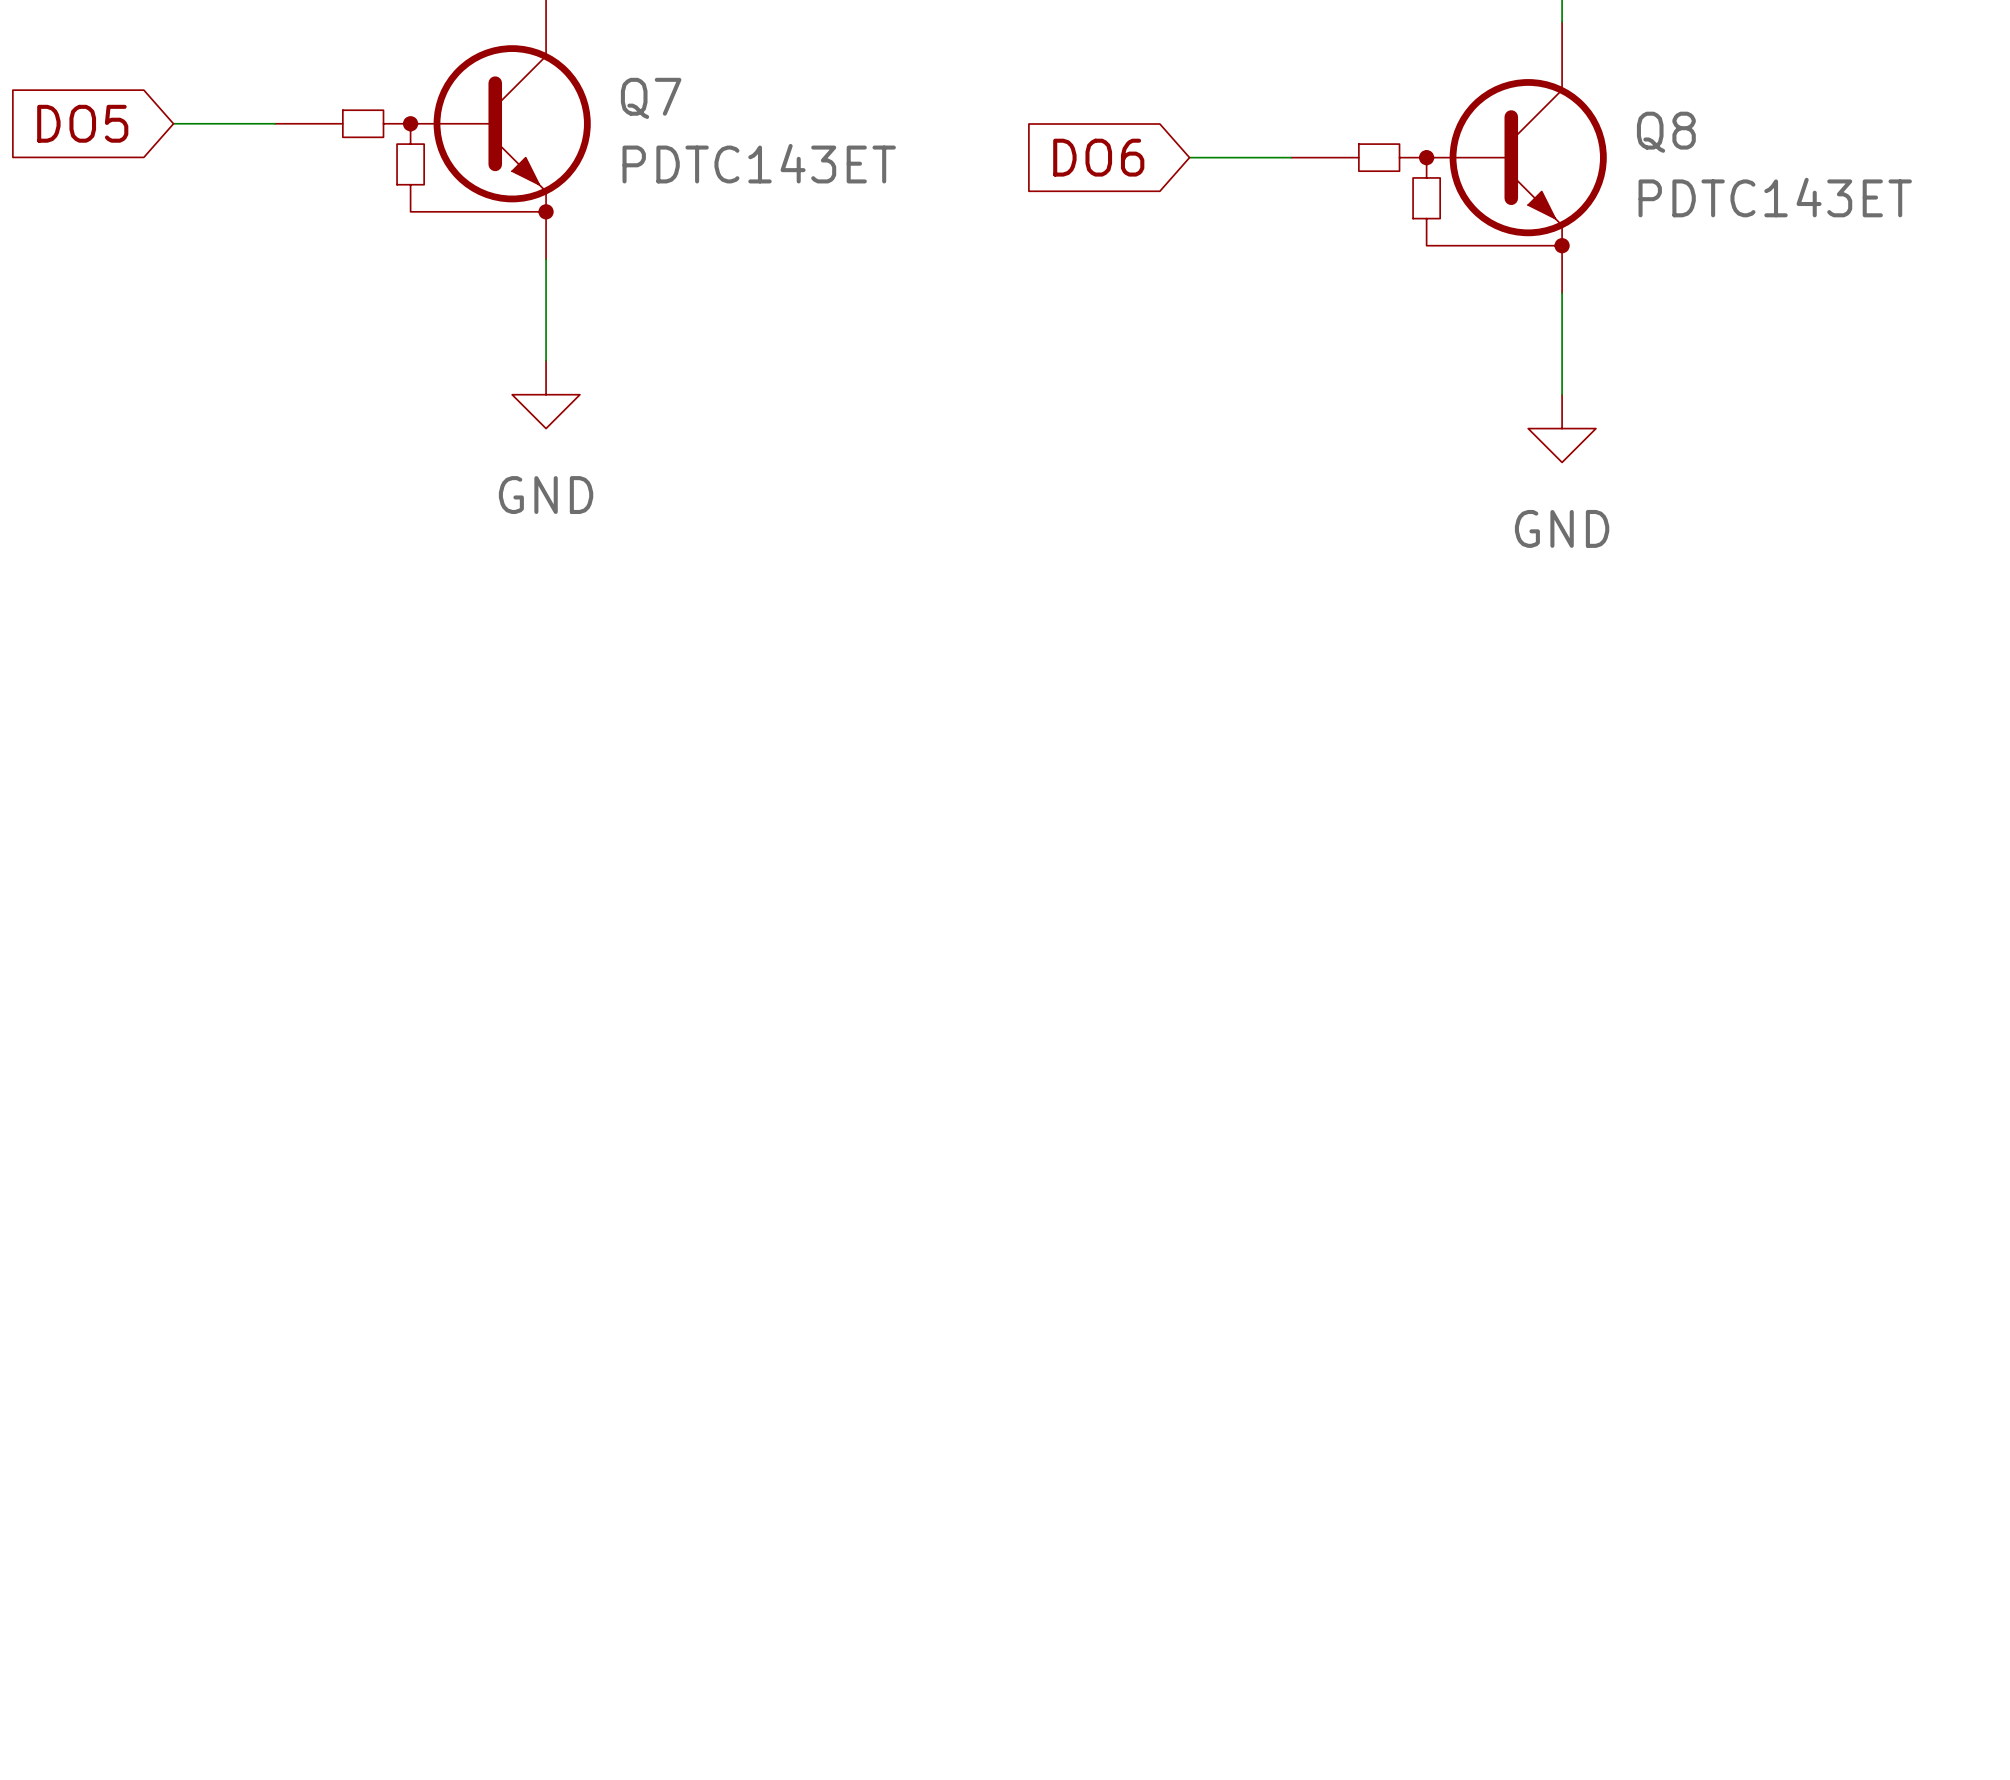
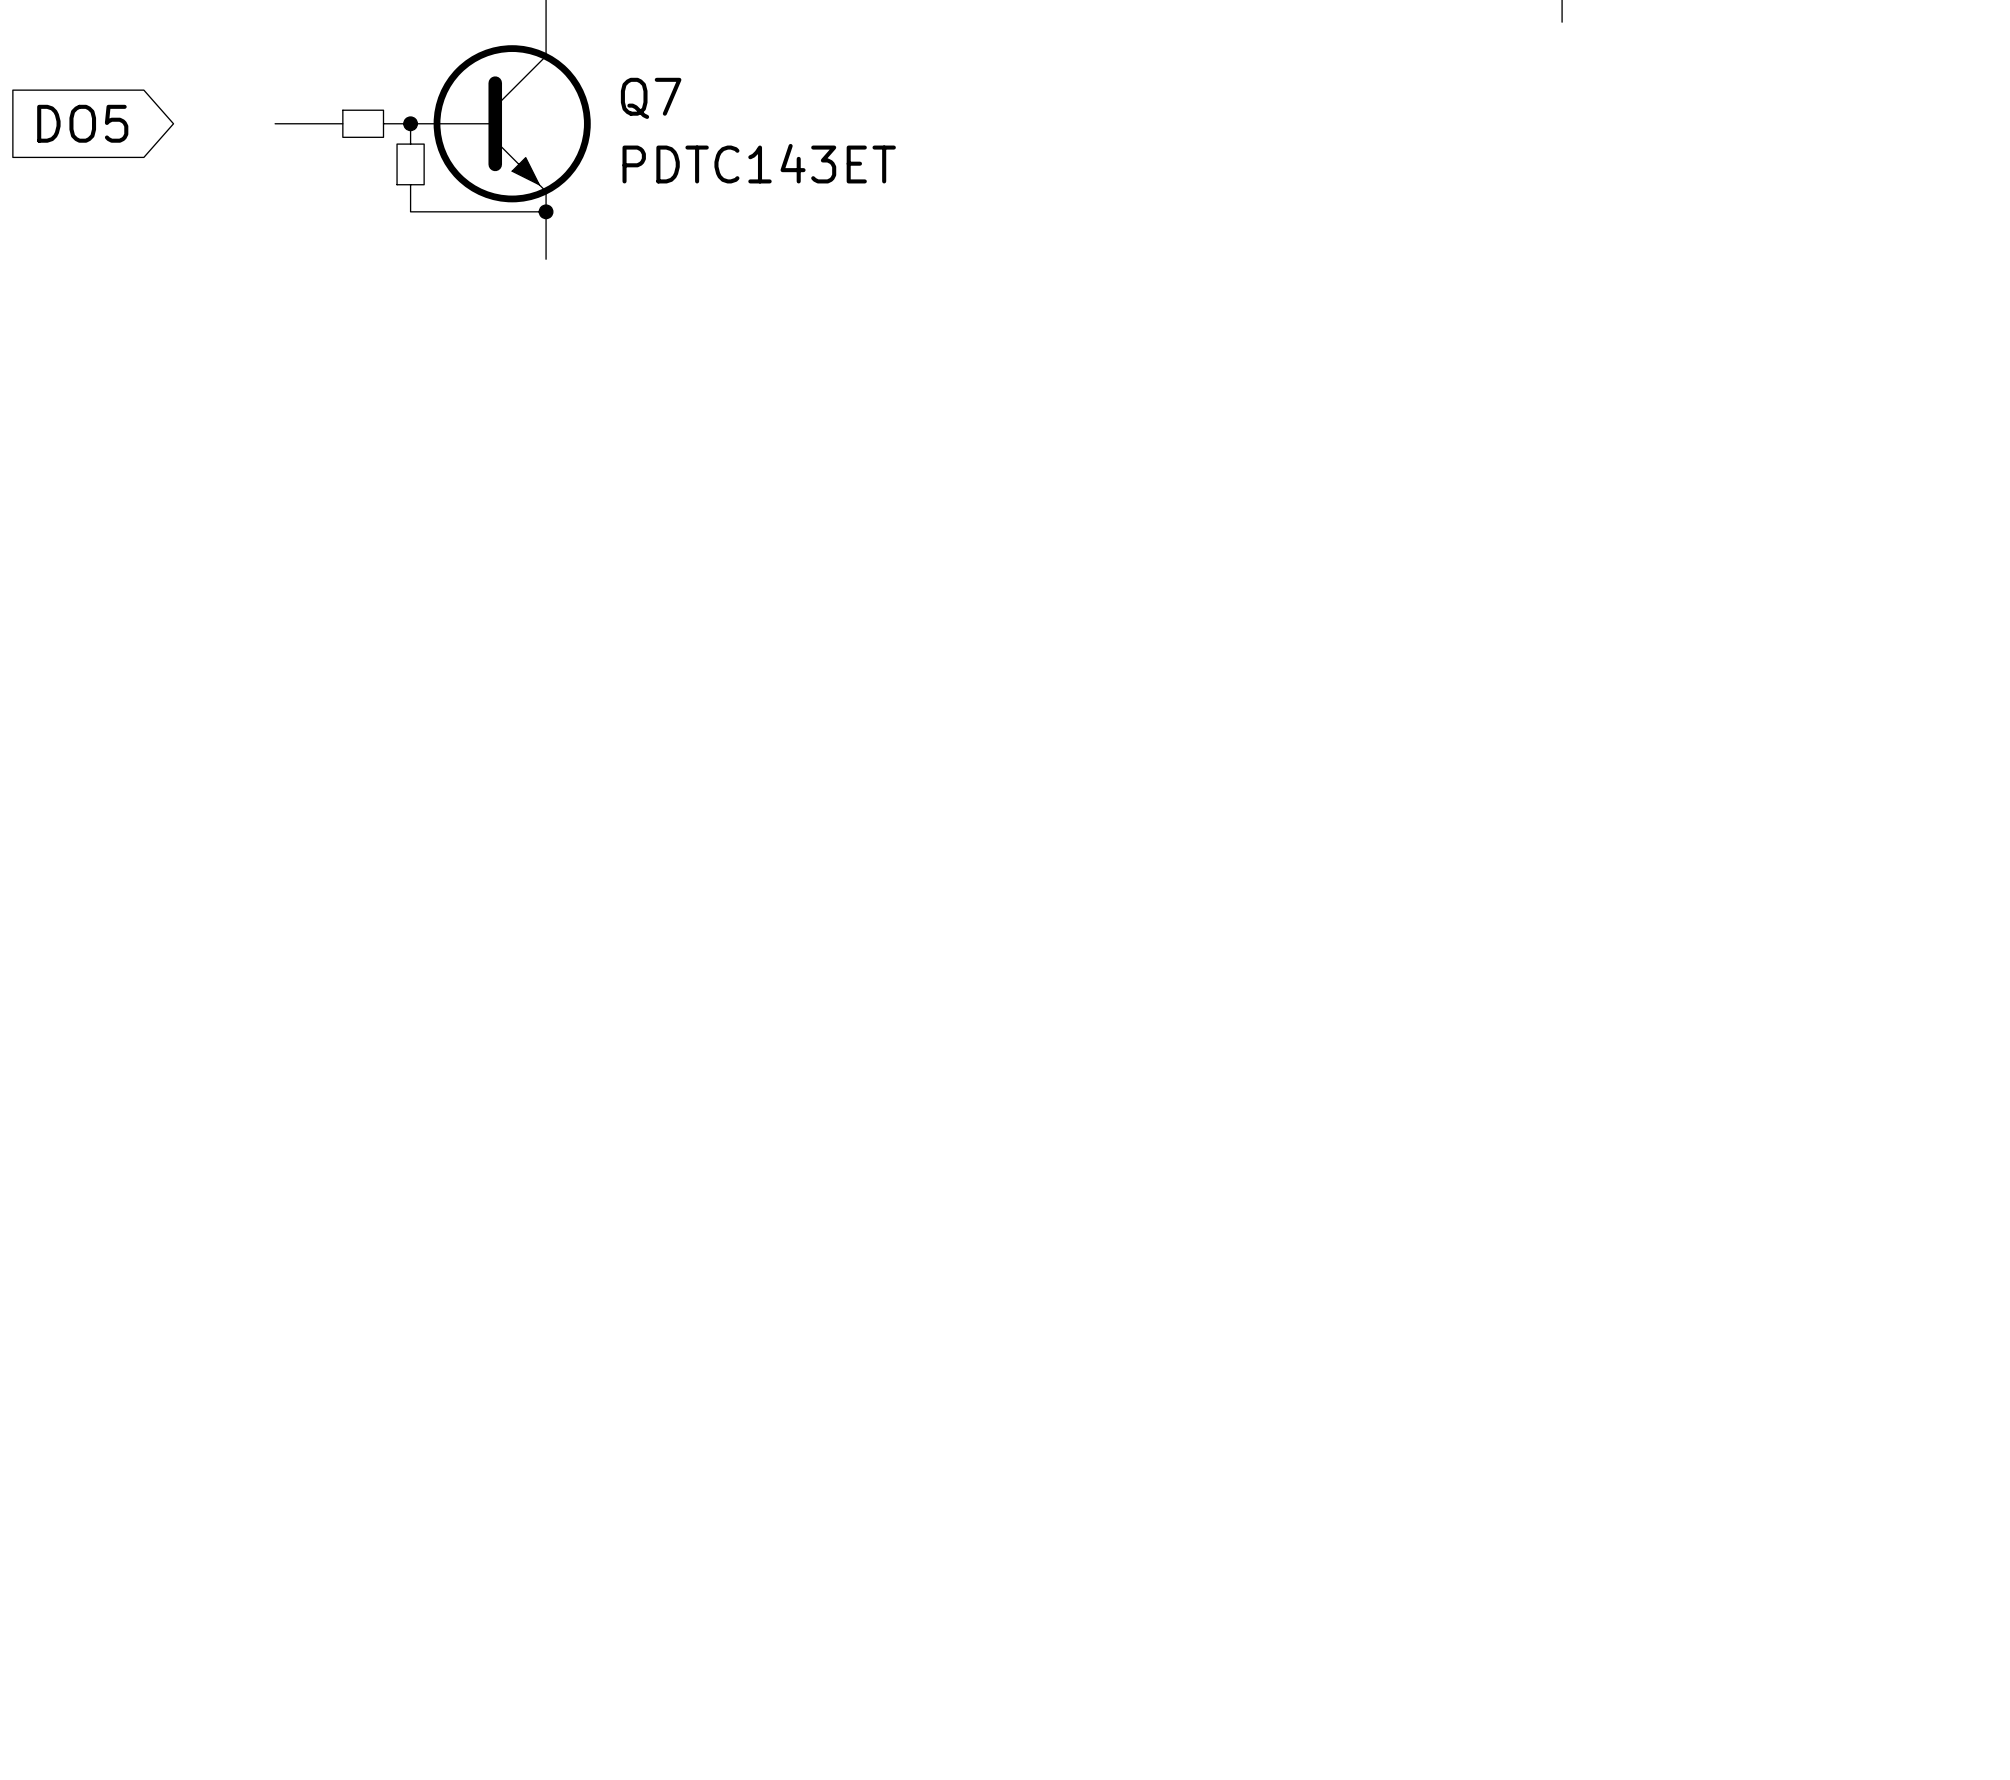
wire: (173, 123) (275, 123) -> none
global label: DO6 (1098, 157) -> none
wire: (1189, 157) (1291, 157) -> none
Q8: PDTC143ET (1448, 157) -> none
wire: (546, 259) (546, 360) -> none
wire: (1562, 293) (1562, 394) -> none
power symbol: GND (546, 394) -> none
power symbol: GND (1562, 428) -> none

